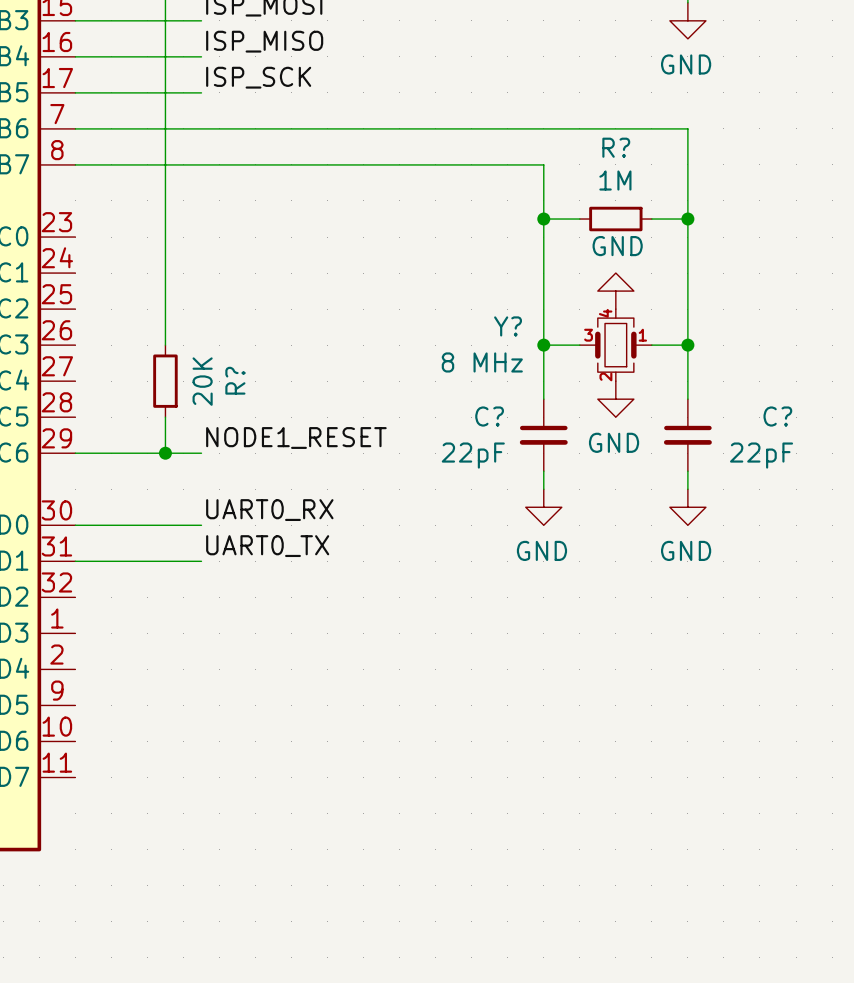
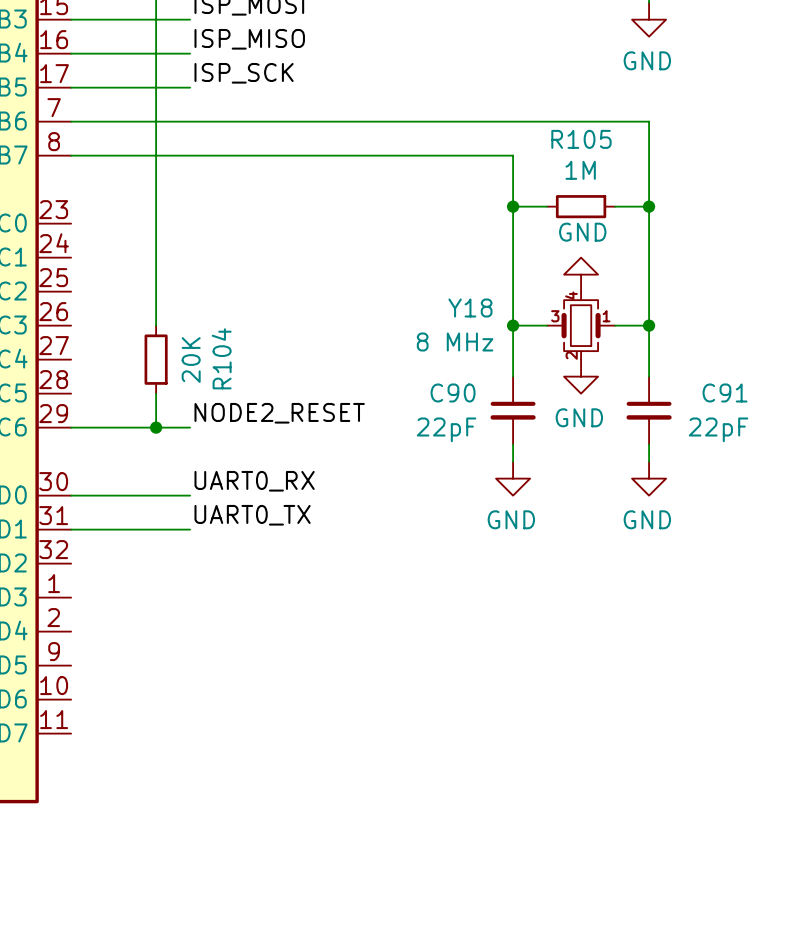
R? name: R? (616, 147) -> R105 (581, 139)
Y? name: Y? (508, 326) -> Y18 (470, 308)
R? name: R? (235, 380) -> R104 (221, 358)
C? name: C? (489, 416) -> C90 (453, 392)
C? name: C? (777, 416) -> C91 (725, 392)
label: NODE1_RESET (296, 438) -> NODE2_RESET (279, 413)

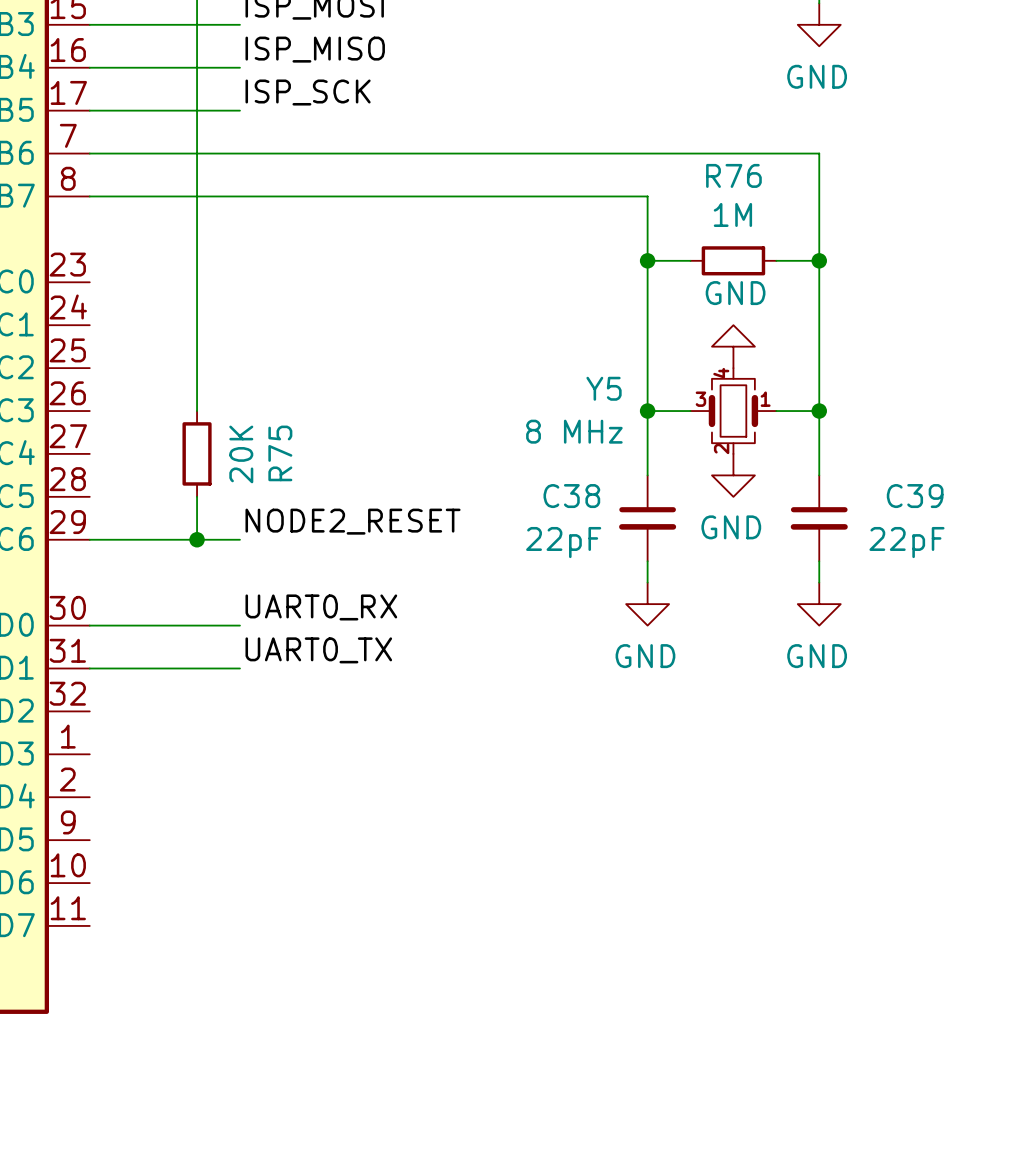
R105 name: R105 (581, 139) -> R76 (733, 175)
Y18 name: Y18 (470, 308) -> Y5 (604, 388)
R104 name: R104 (221, 358) -> R75 (280, 453)
C90 name: C90 (453, 392) -> C38 (571, 496)
C91 name: C91 (725, 392) -> C39 (915, 496)

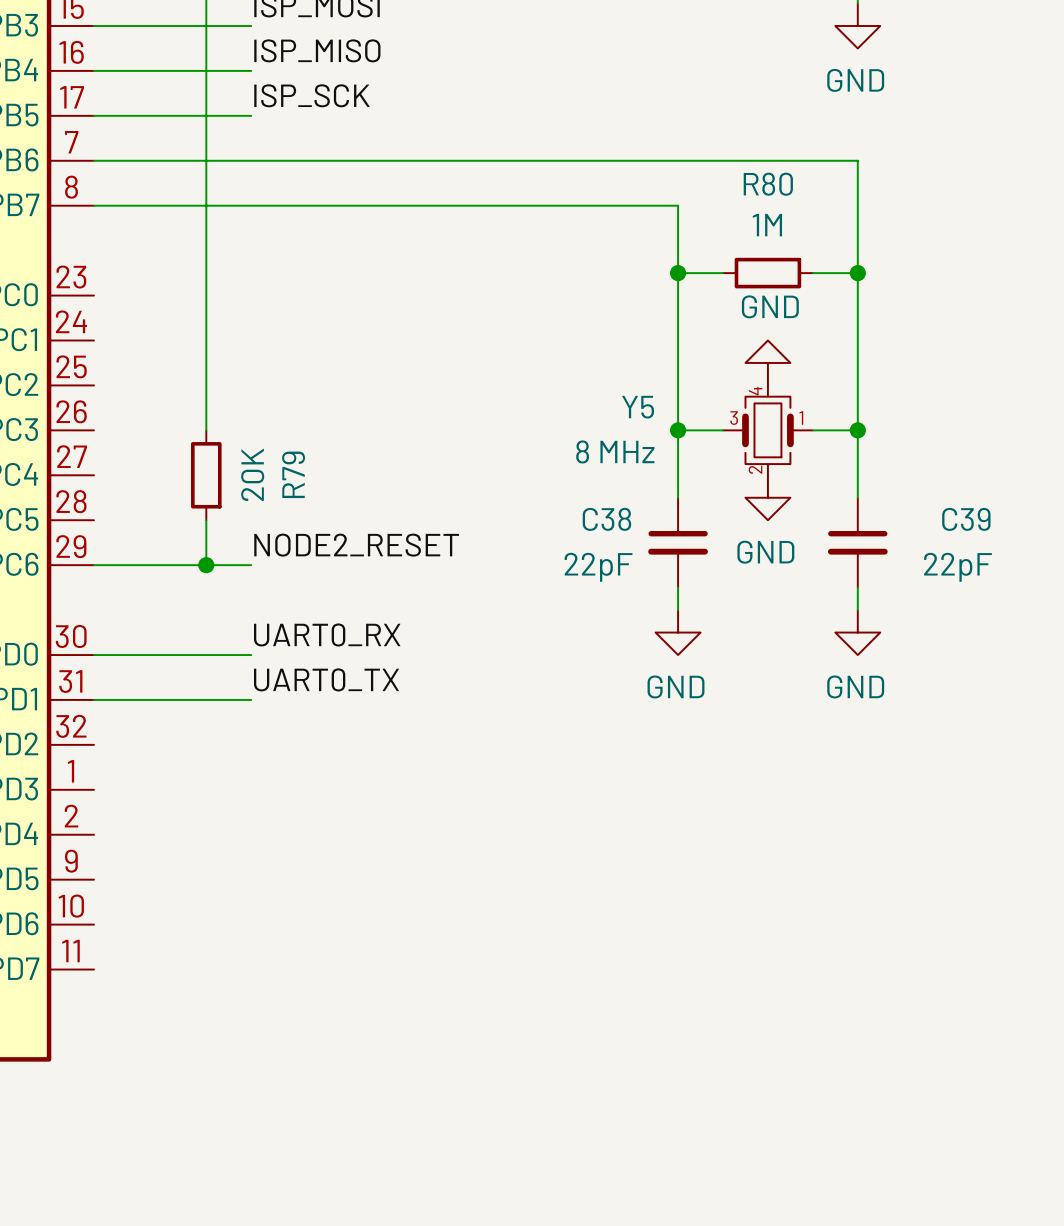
R76 name: R76 (733, 175) -> R80 (768, 184)
R75 name: R75 (280, 453) -> R79 (293, 474)

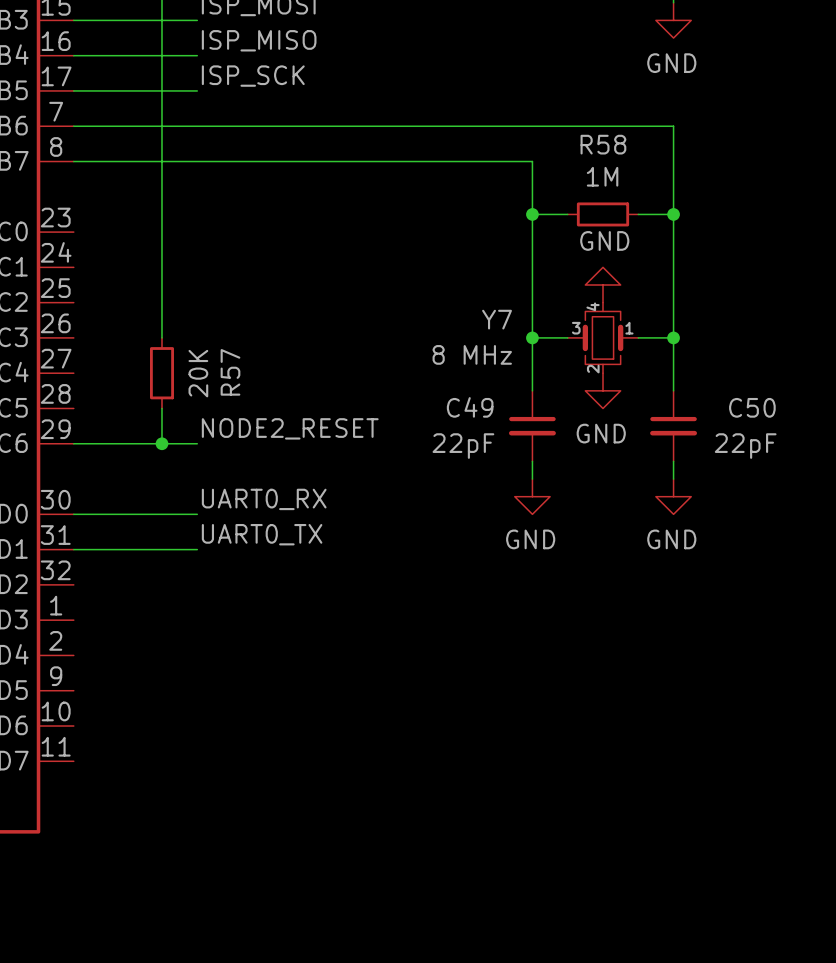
R80 name: R80 (768, 184) -> R58 (603, 144)
Y5 name: Y5 (638, 407) -> Y7 (497, 319)
R79 name: R79 (293, 474) -> R57 (230, 372)
C38 name: C38 (606, 519) -> C49 (470, 407)
C39 name: C39 (966, 519) -> C50 (752, 407)

